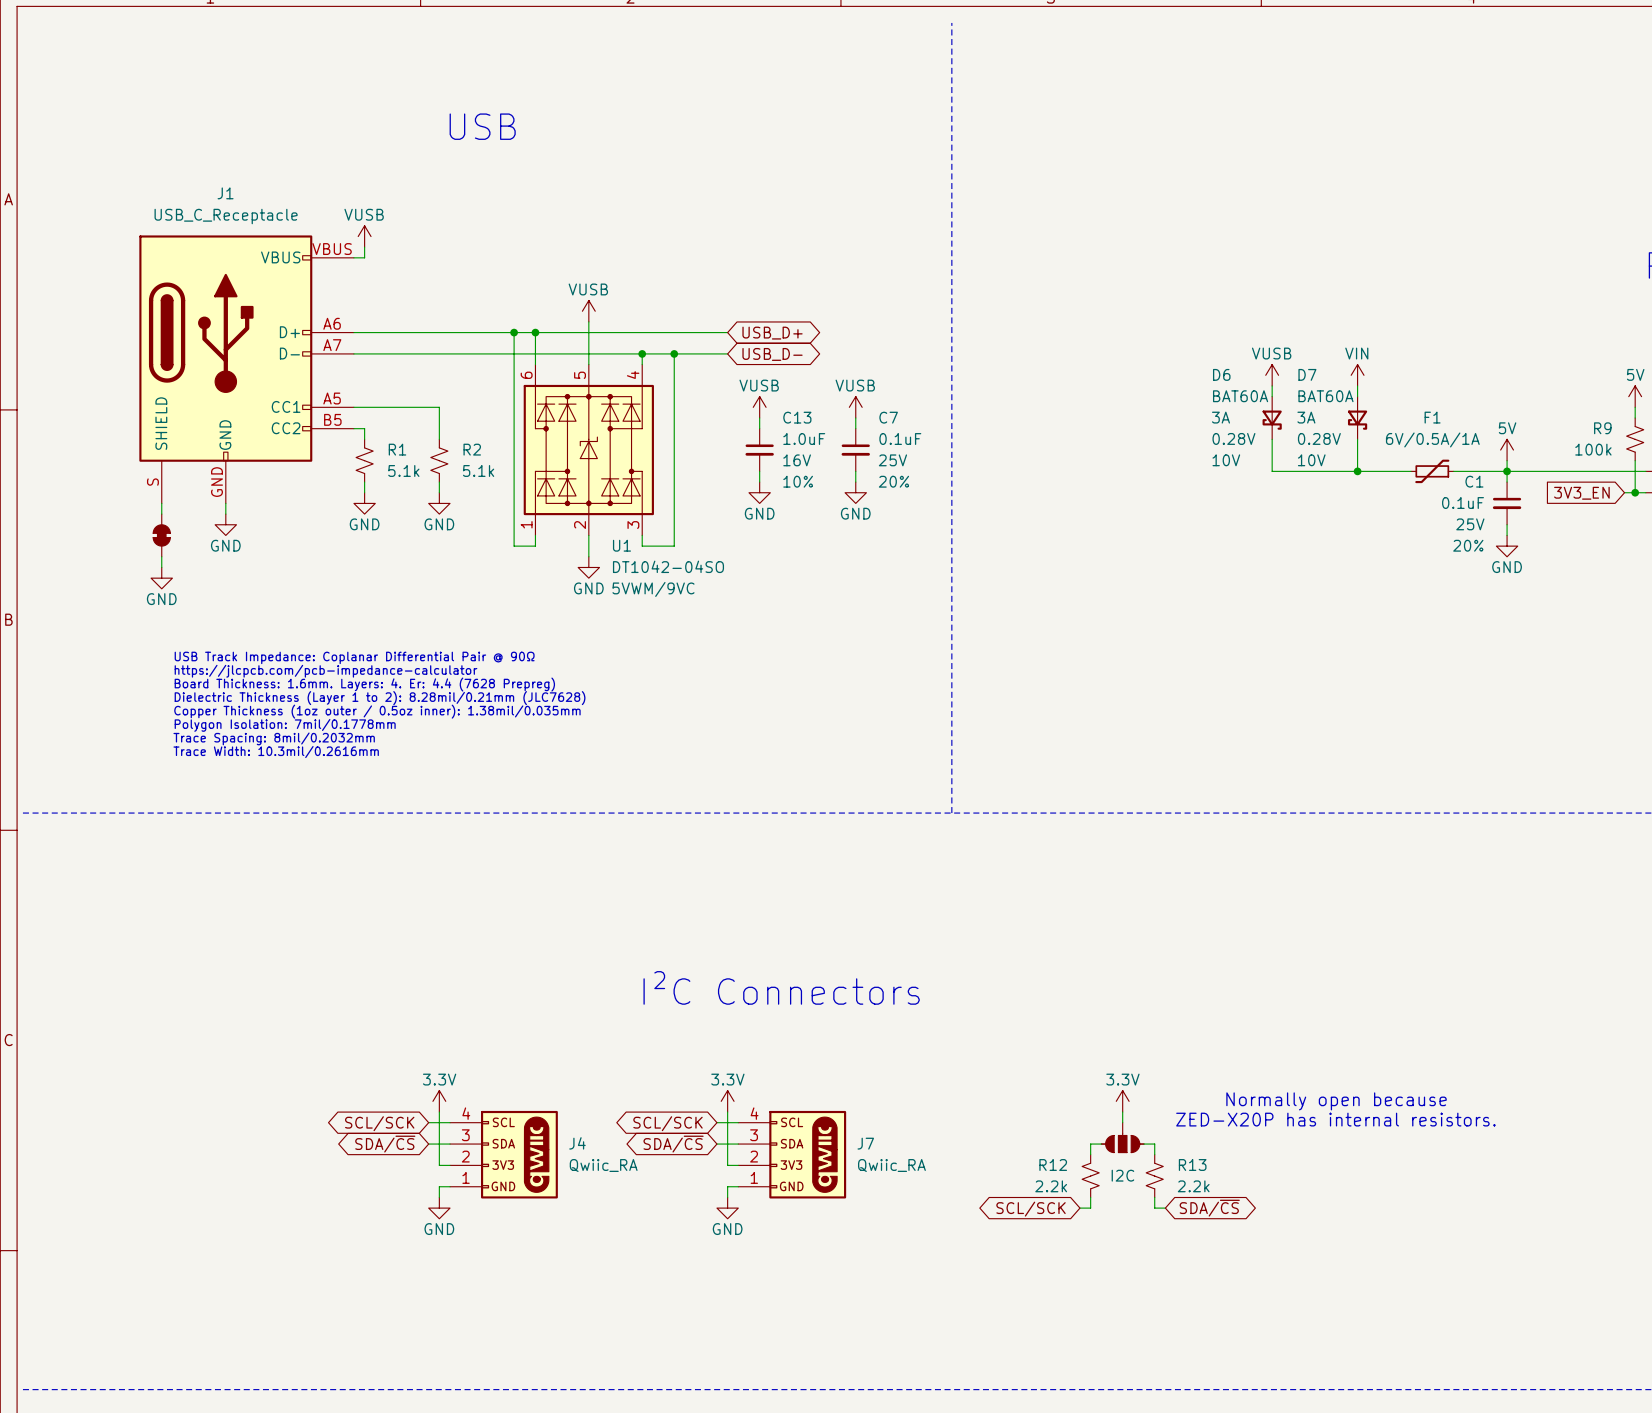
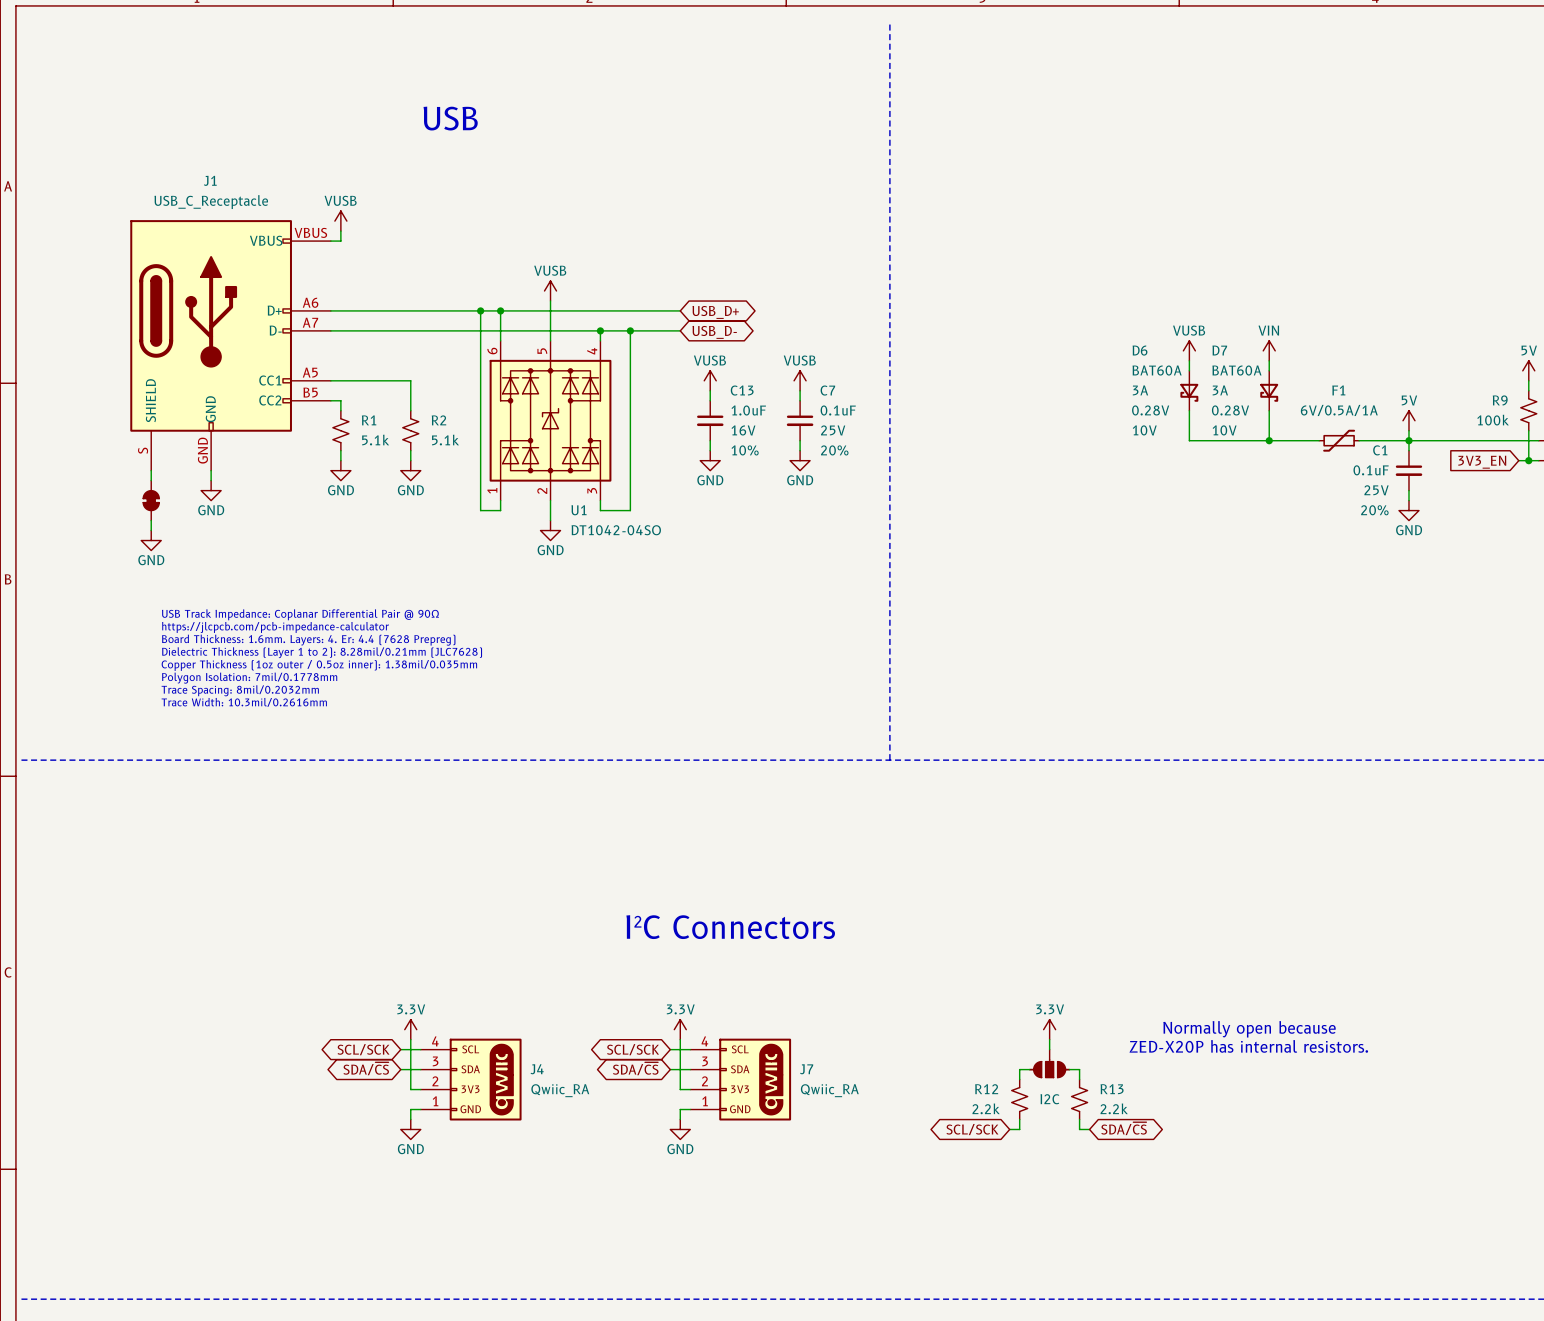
U1 text: 5VWM/9VC (653, 589) -> none

